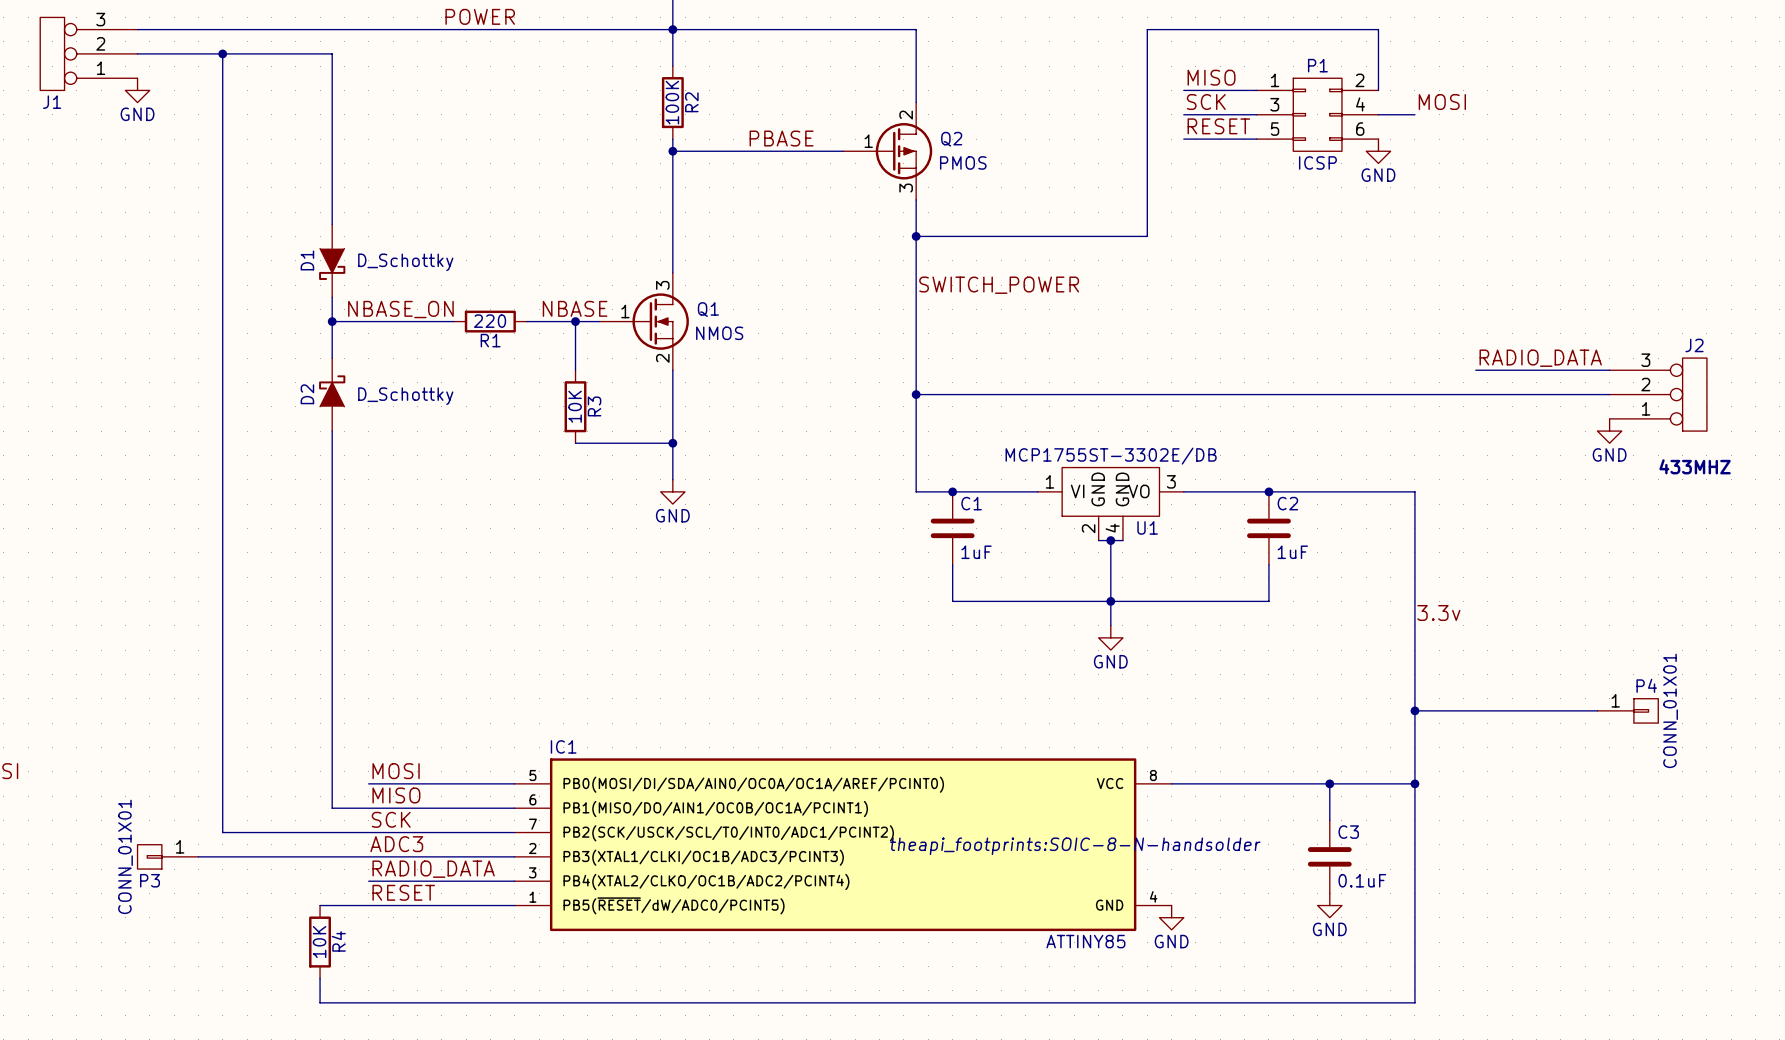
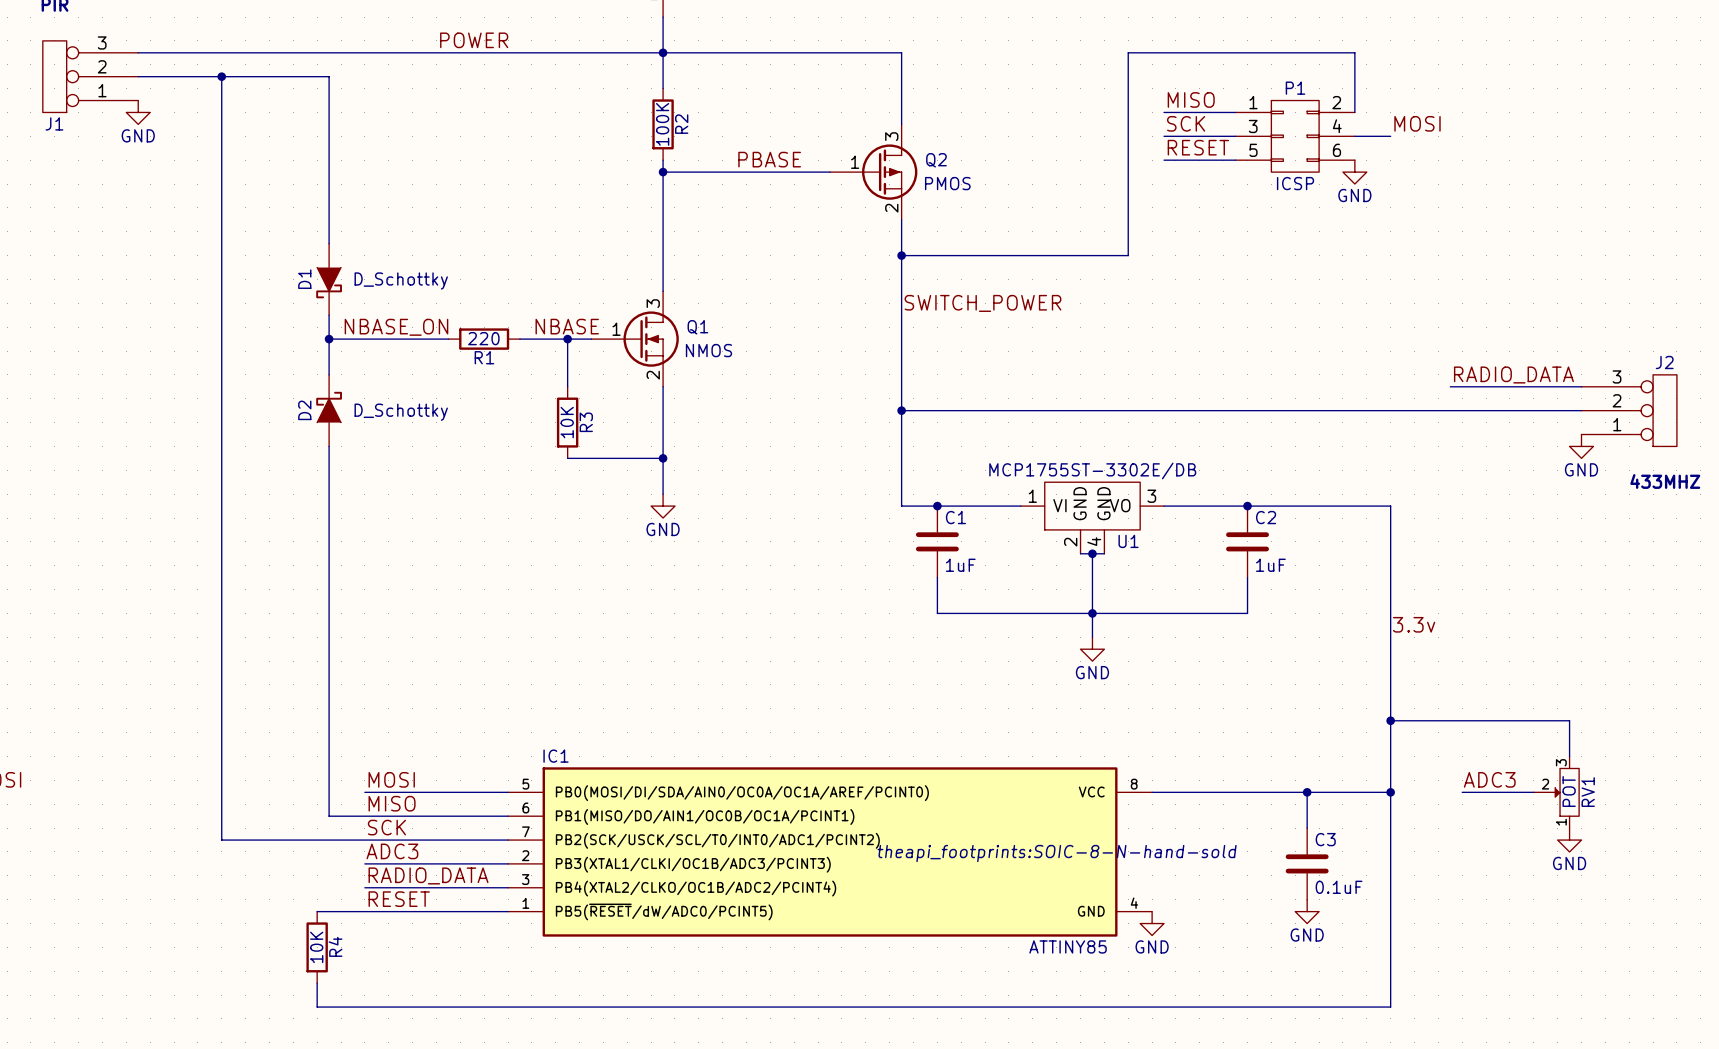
Q2 pin number: 2 (906, 115) -> 3 (891, 136)
Q2 pin number: 3 (906, 188) -> 2 (891, 208)
wire: none -> (1569, 720) (1569, 756)
P4: CONN_01X01 (1627, 710) -> none
label: none -> ADC3 (1489, 779)
wire: none -> (1462, 792) (1533, 792)
RV1: none -> POT (1556, 792)
power symbol: none -> GND (1569, 840)
IC1 text: theapi_footprints:SOIC-8-N-handsolder (1075, 846) -> theapi_footprints:SOIC-8-N-hand-sold (1057, 853)
P3: CONN_01X01 (167, 856) -> none
wire: (198, 856) (368, 856) -> none

